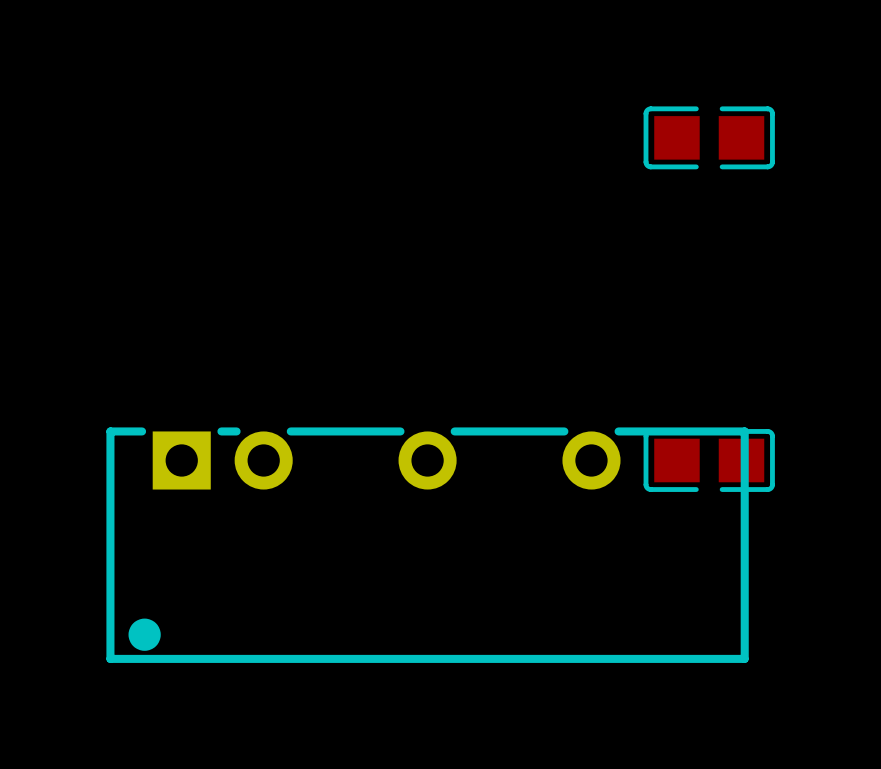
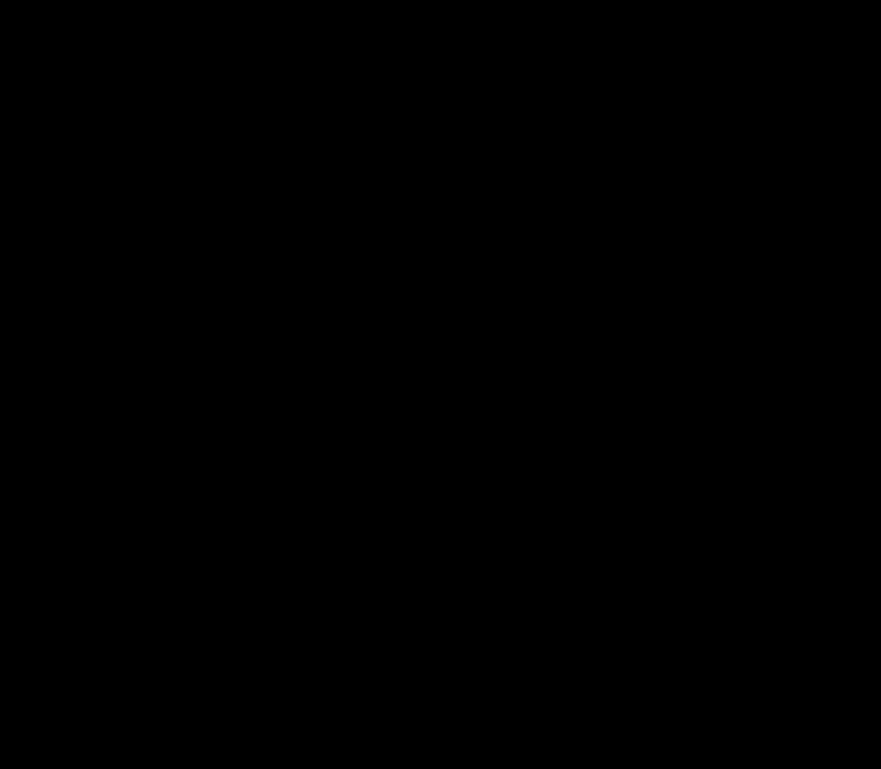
part: (709, 137) -> none
part: (709, 460) -> none
part: (427, 545) -> none

